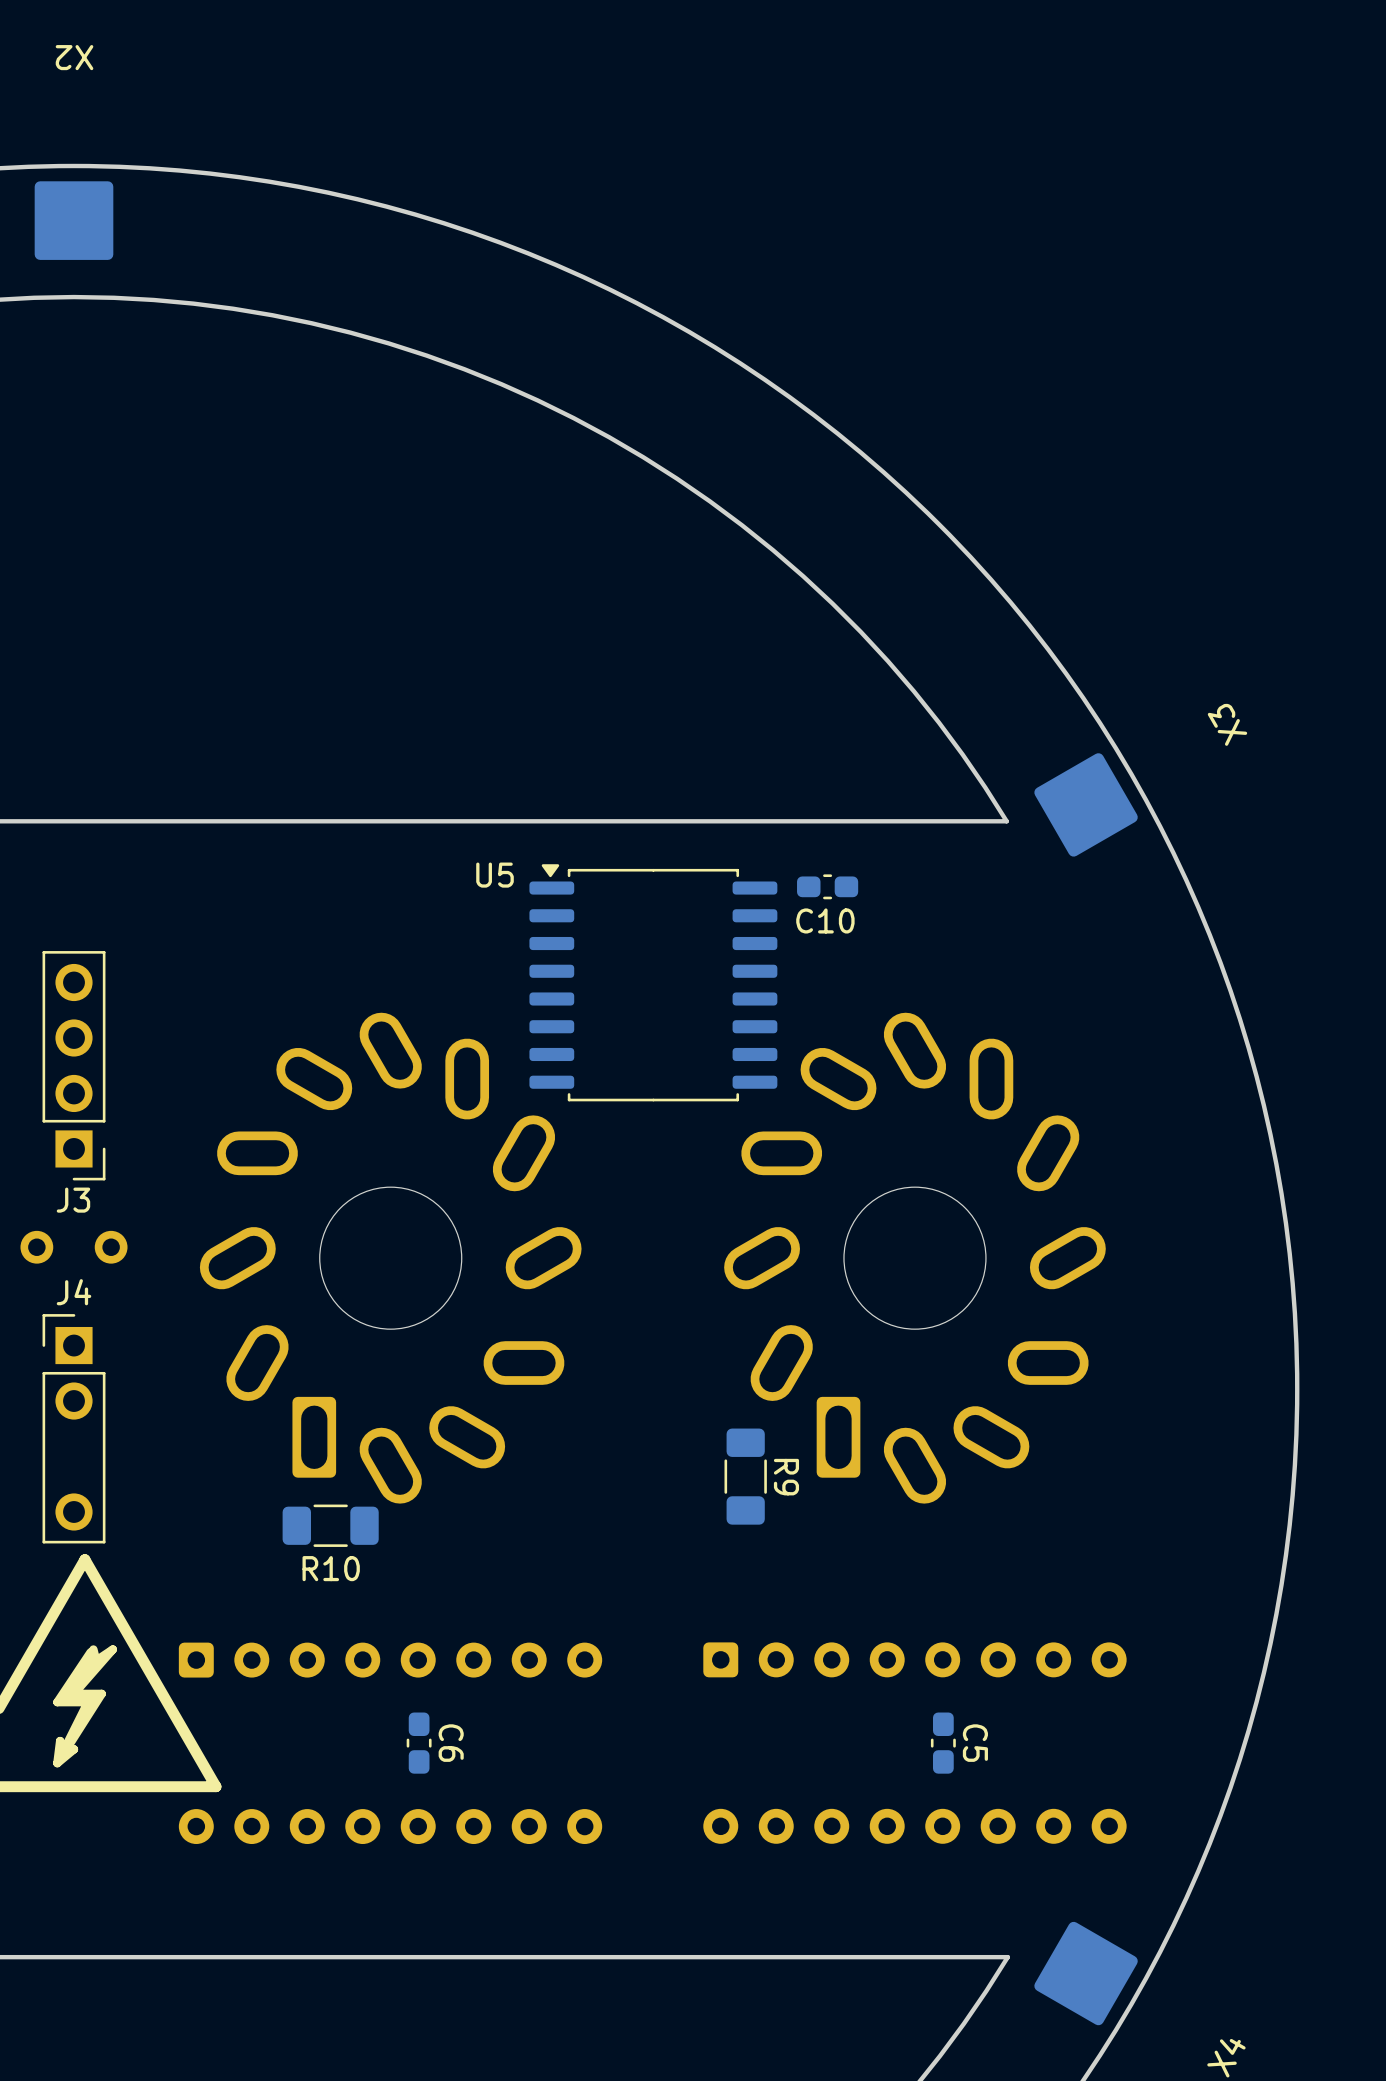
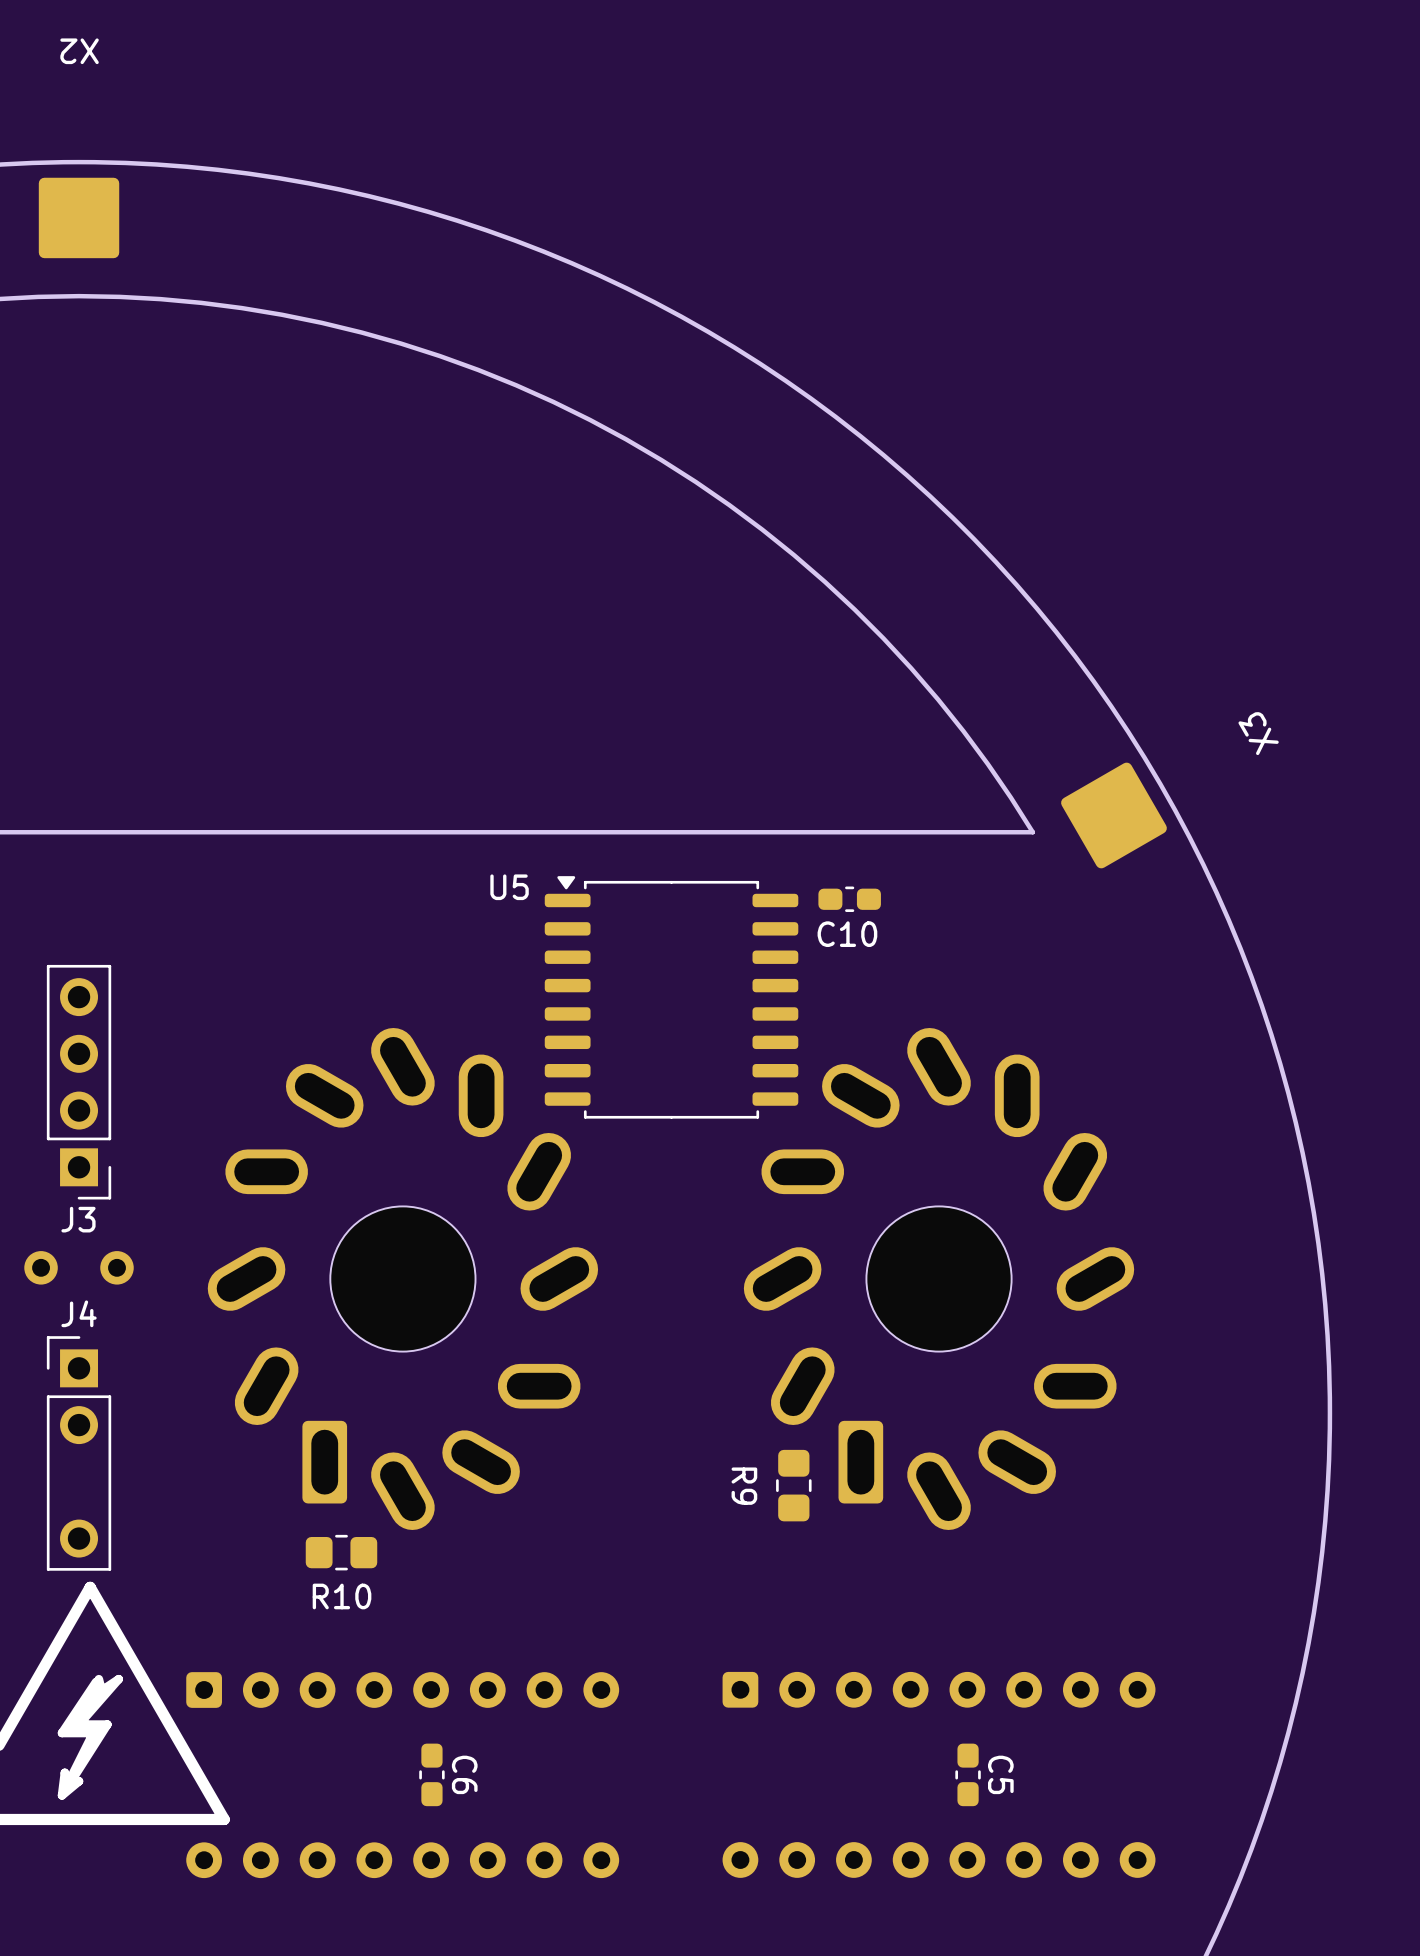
R9 footprint: [724, 1428, 767, 1525] -> [776, 1449, 812, 1522]
R9 name position: R9 (786, 1477) -> R9 (744, 1486)
R10 footprint: [282, 1504, 379, 1547] -> [305, 1534, 378, 1571]

